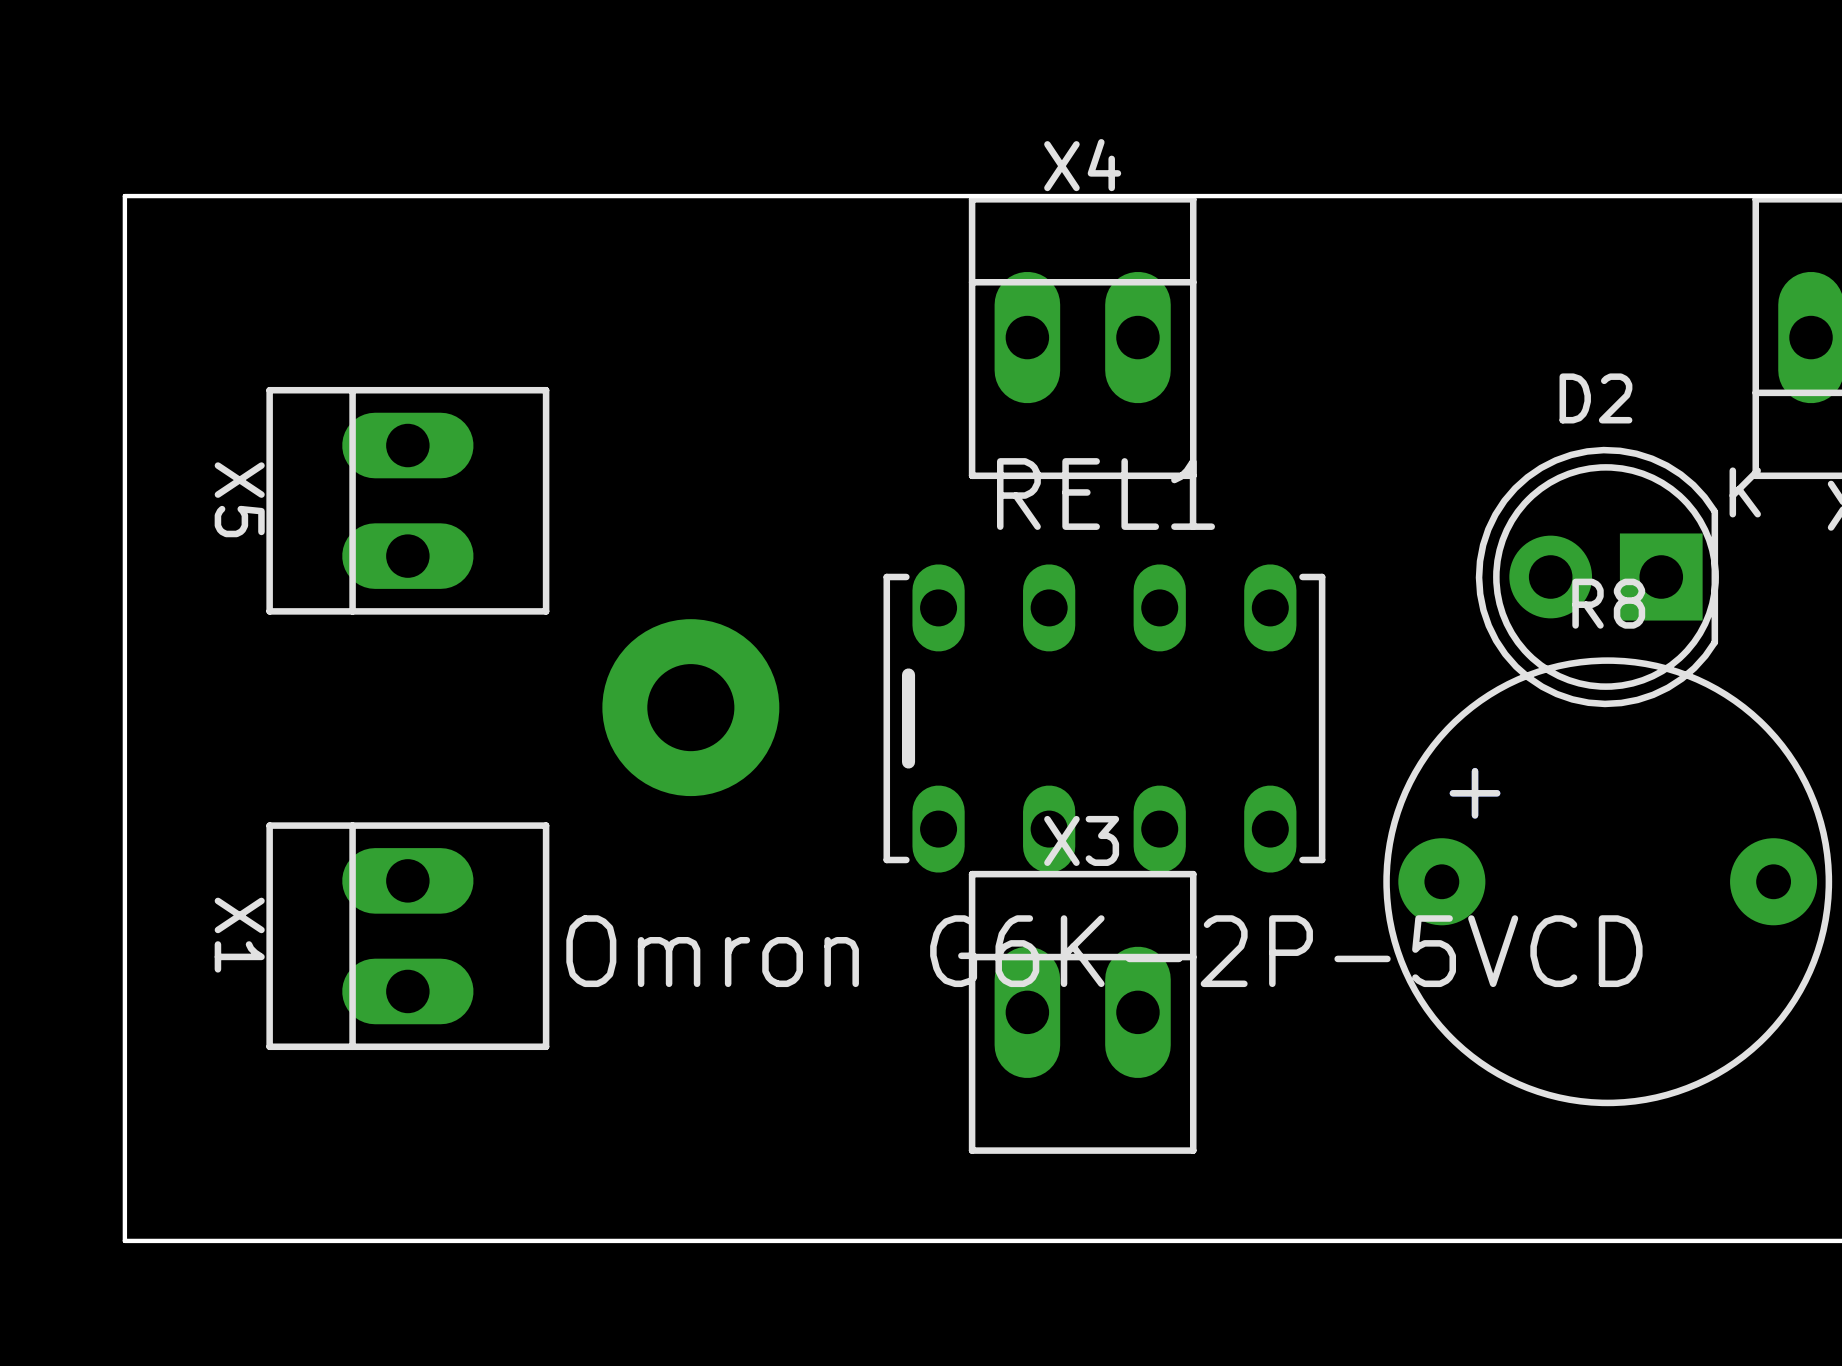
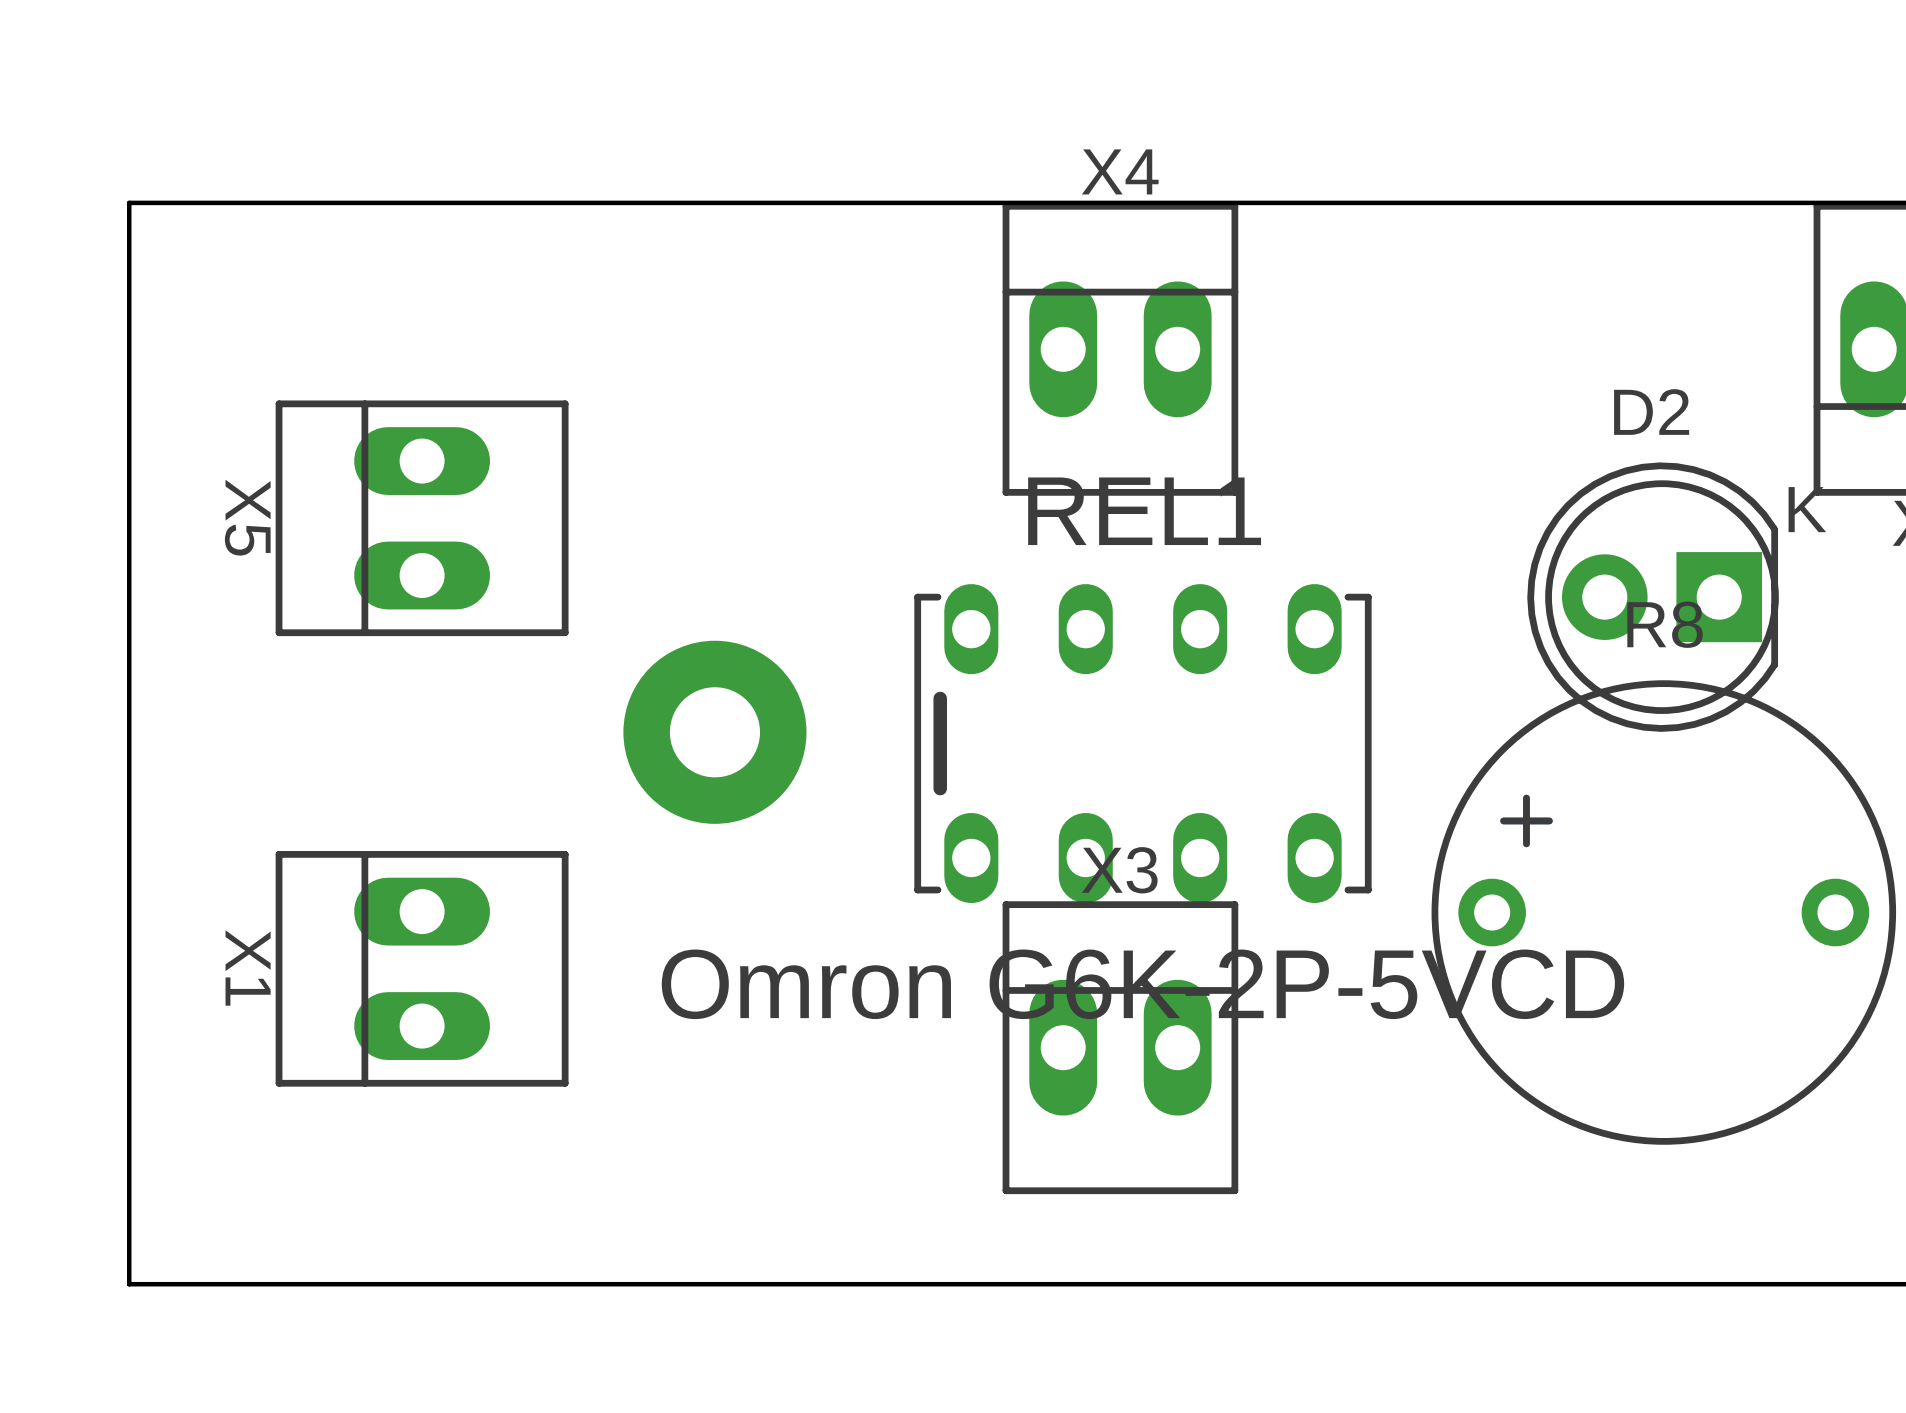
R8 footprint: [1383, 657, 1833, 1107] -> [1431, 680, 1897, 1145]

